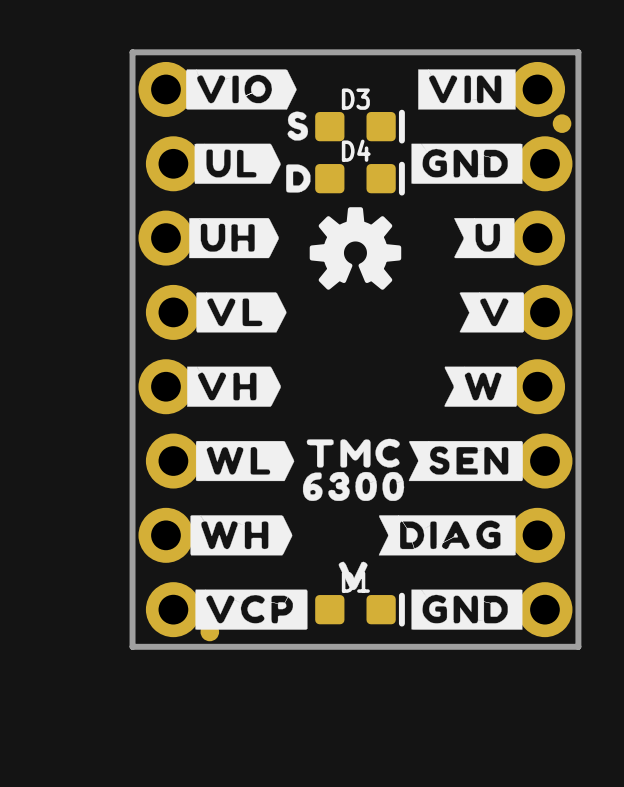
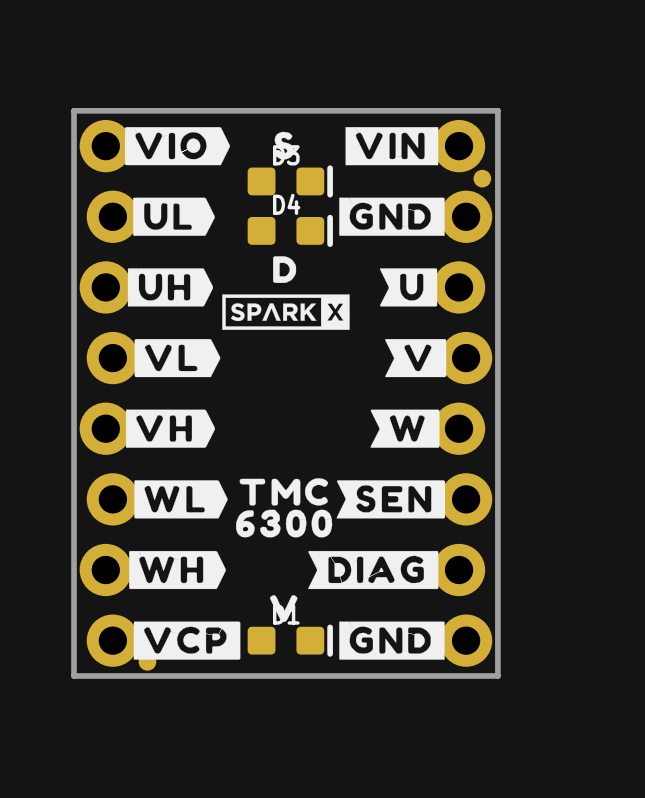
drawing position: (297, 126) -> (284, 145)
drawing position: (298, 178) -> (284, 269)
drawing shape: [309, 207, 402, 290] -> [222, 294, 350, 330]

